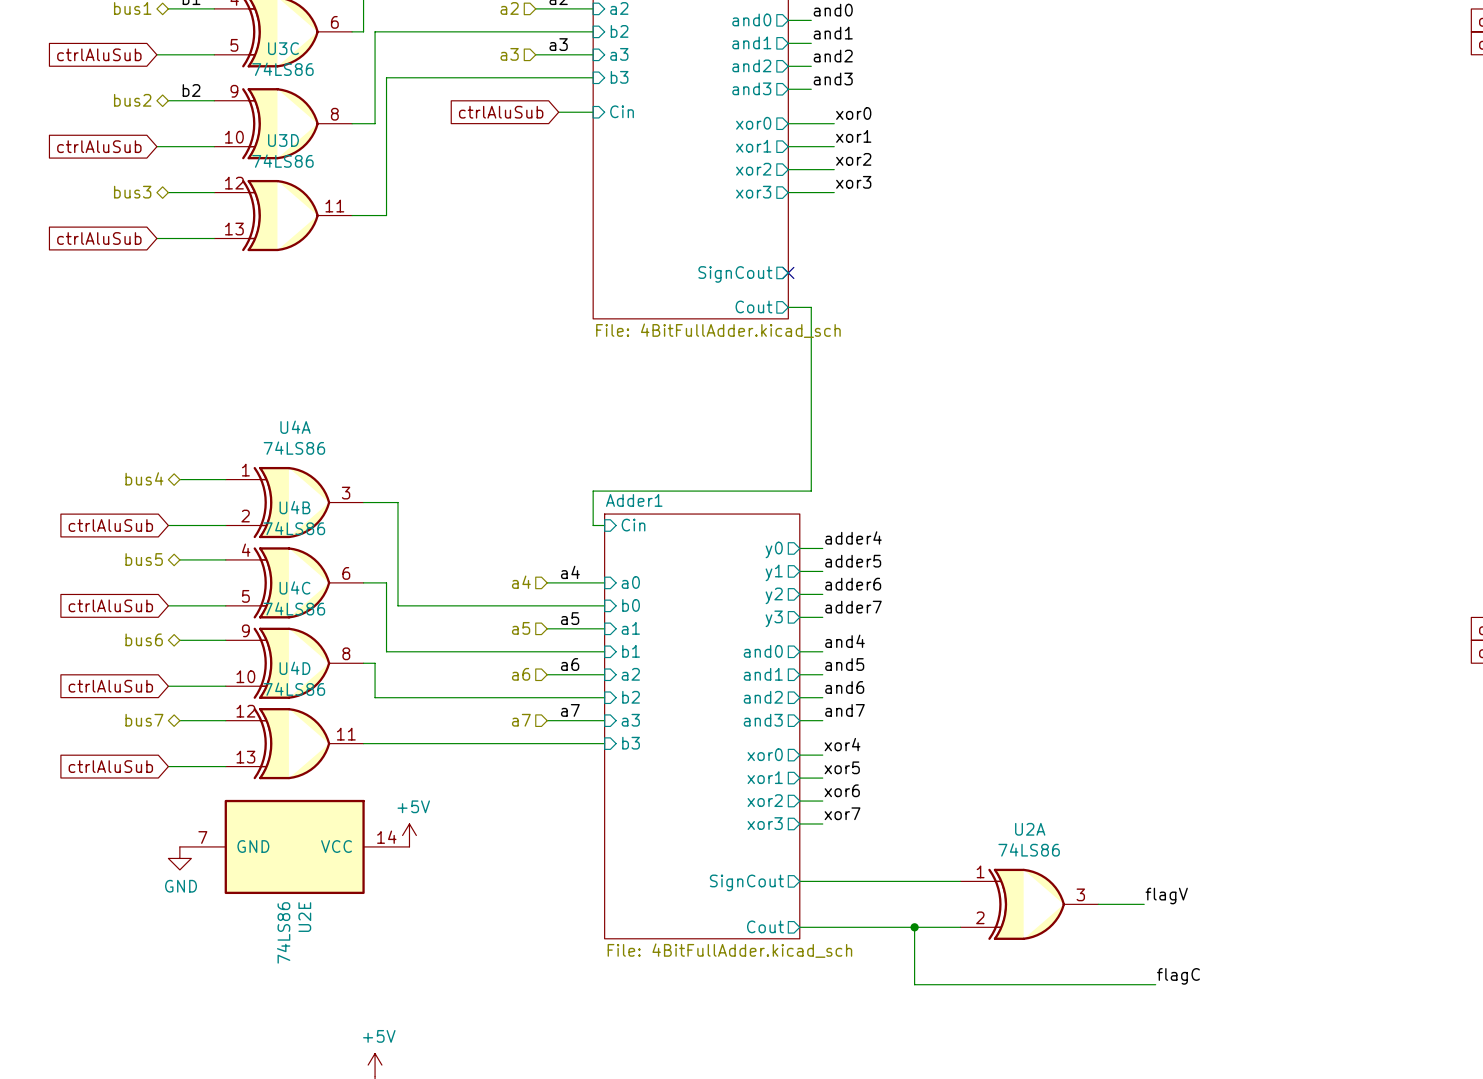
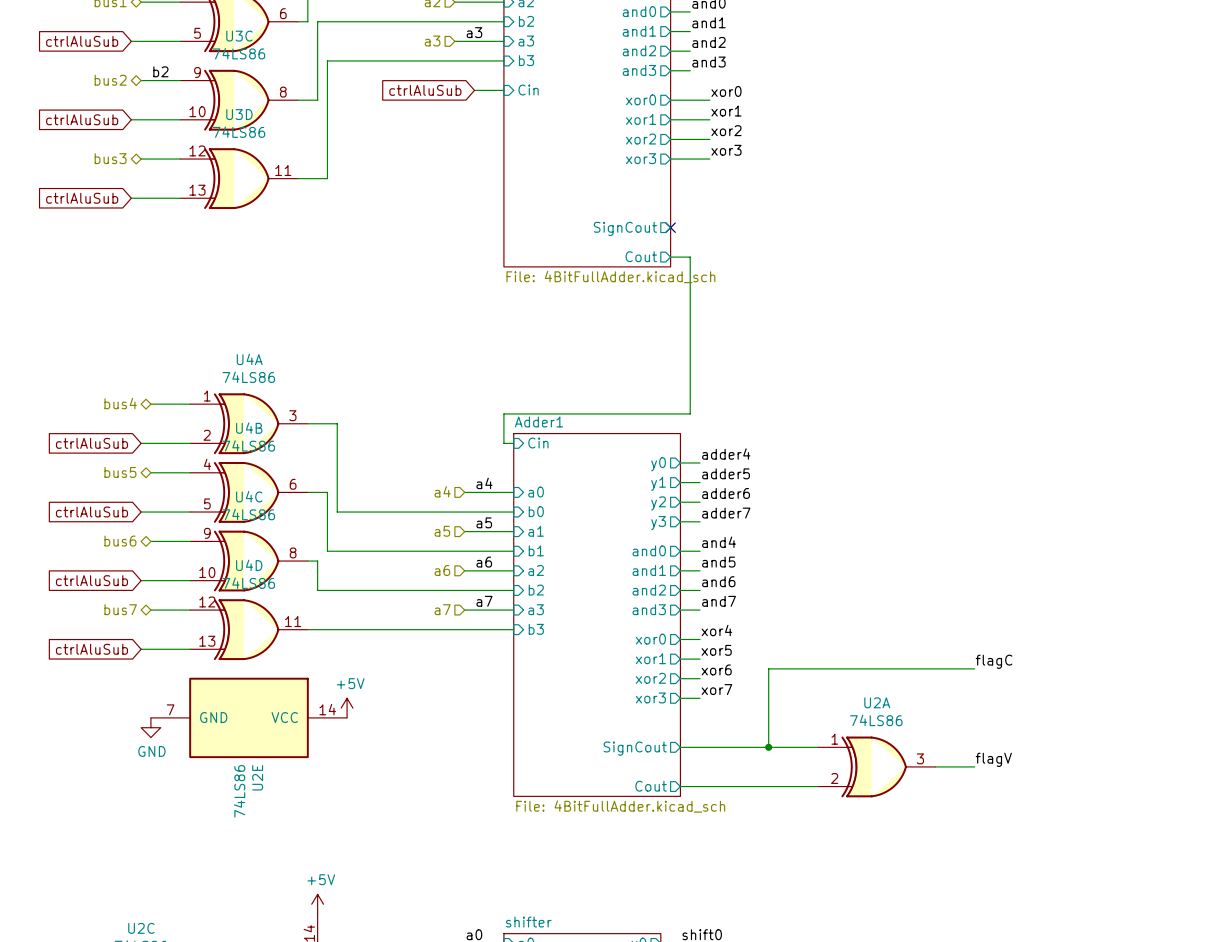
wire: none -> (974, 668) (768, 668) (768, 747)
wire: (914, 927) (914, 984) (1155, 984) -> none
junction position: (914, 927) -> (768, 747)
label position: flagC (1178, 976) -> flagC (994, 661)

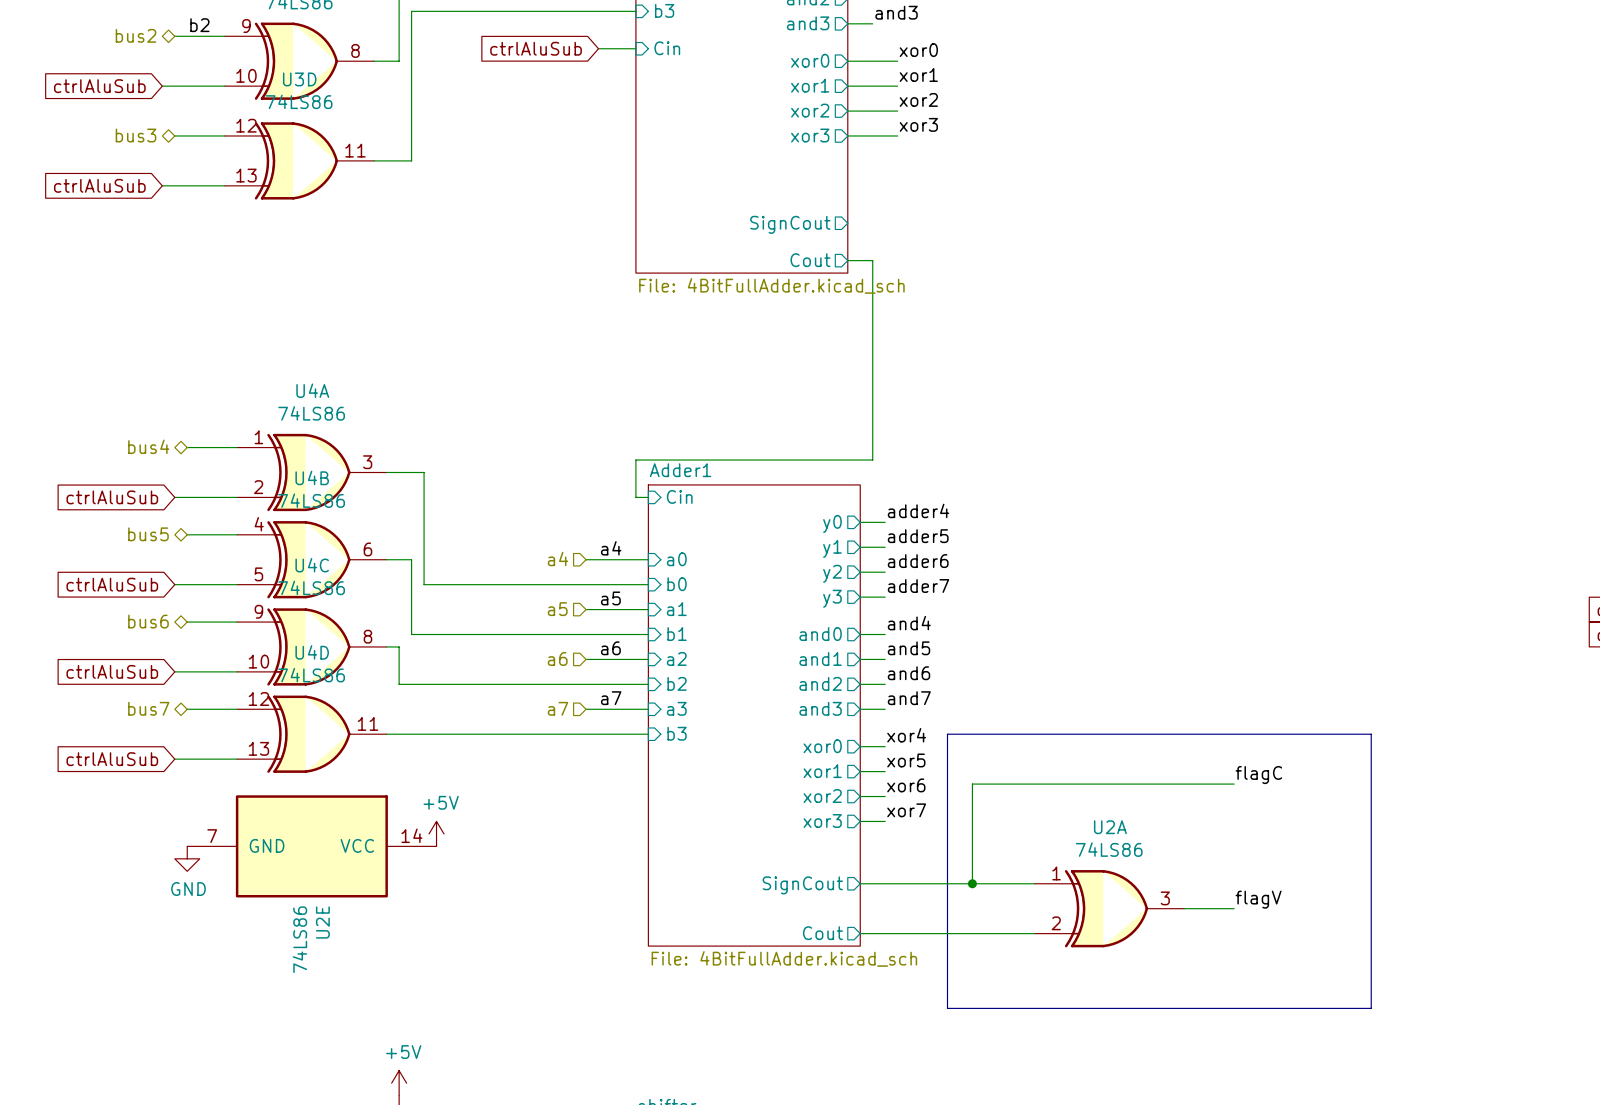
no-connect mark: (670, 227) -> none
line: none -> (947, 734) (947, 1008) (1371, 1008) (1371, 734) (947, 734)

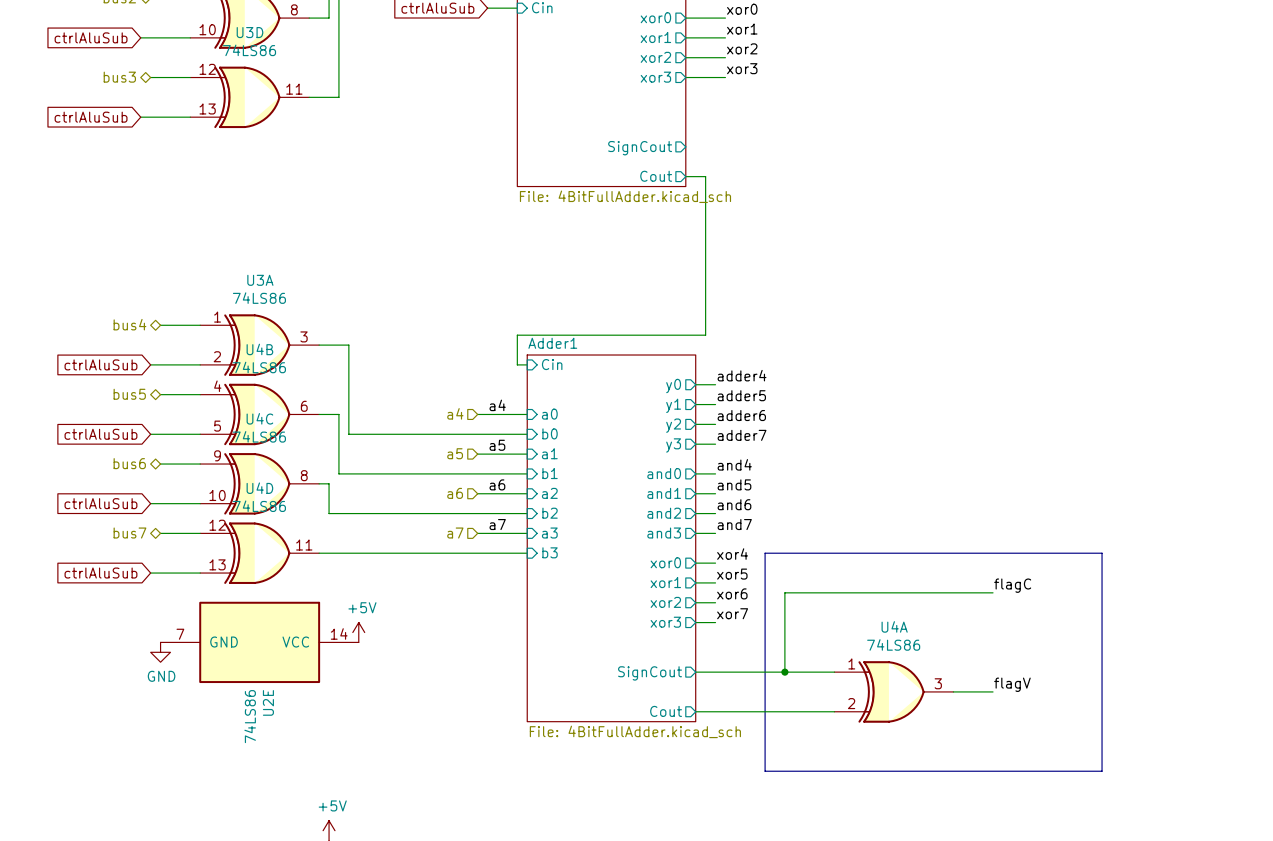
U4A name: U4A (312, 390) -> U3A (260, 280)
U2A name: U2A (1110, 827) -> U4A (894, 626)

